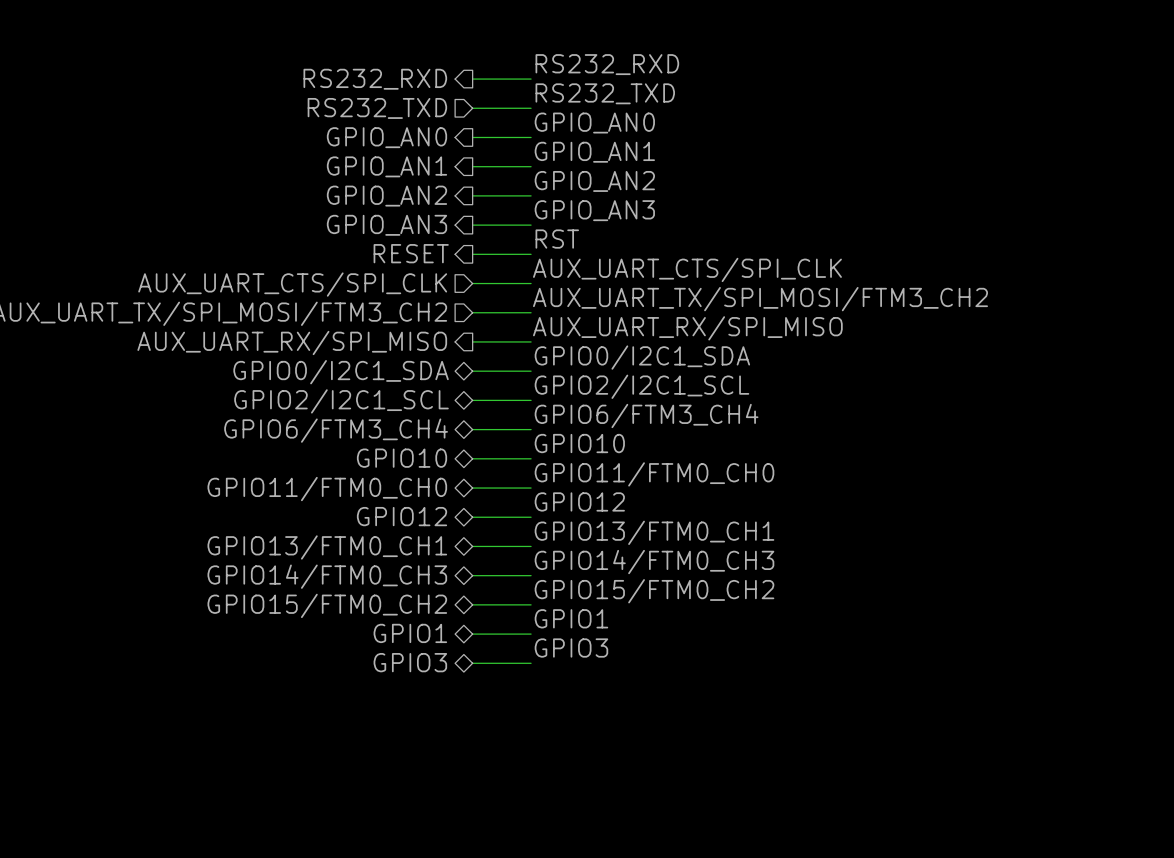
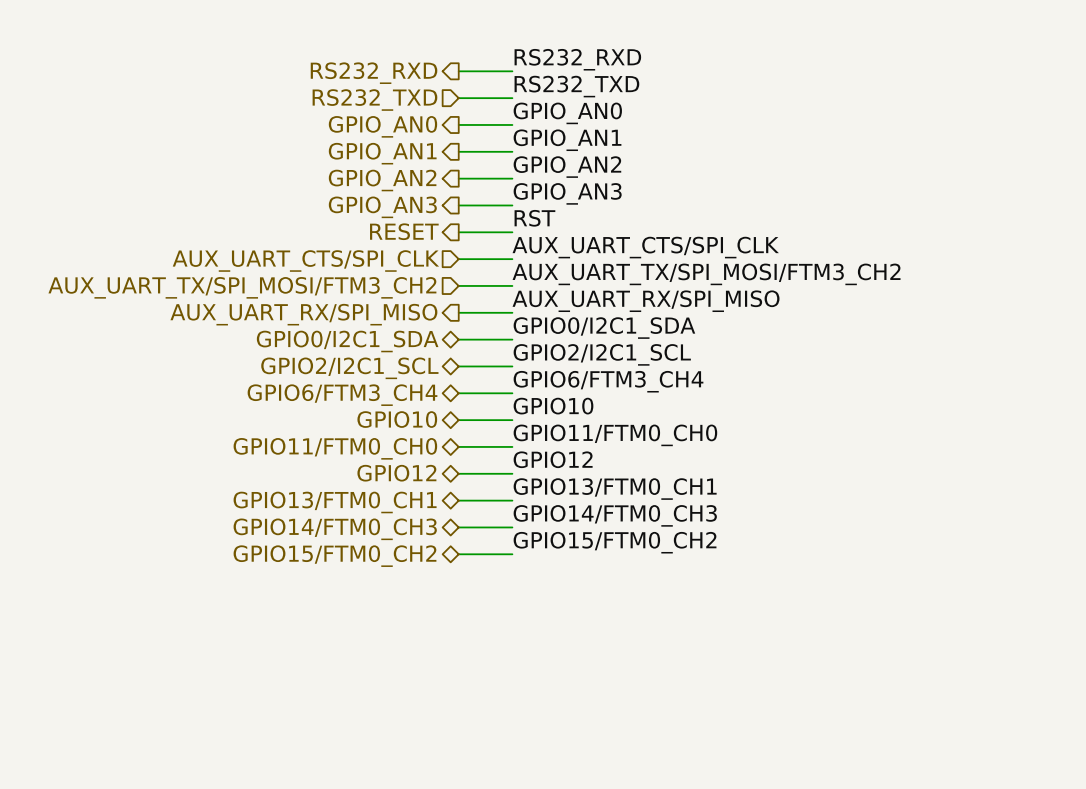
label: GPIO1 (571, 618) -> none
hierarchical label: GPIO1 (410, 633) -> none
wire: (472, 634) (531, 634) -> none
label: GPIO3 (571, 648) -> none
hierarchical label: GPIO3 (410, 662) -> none
wire: (472, 663) (531, 663) -> none

